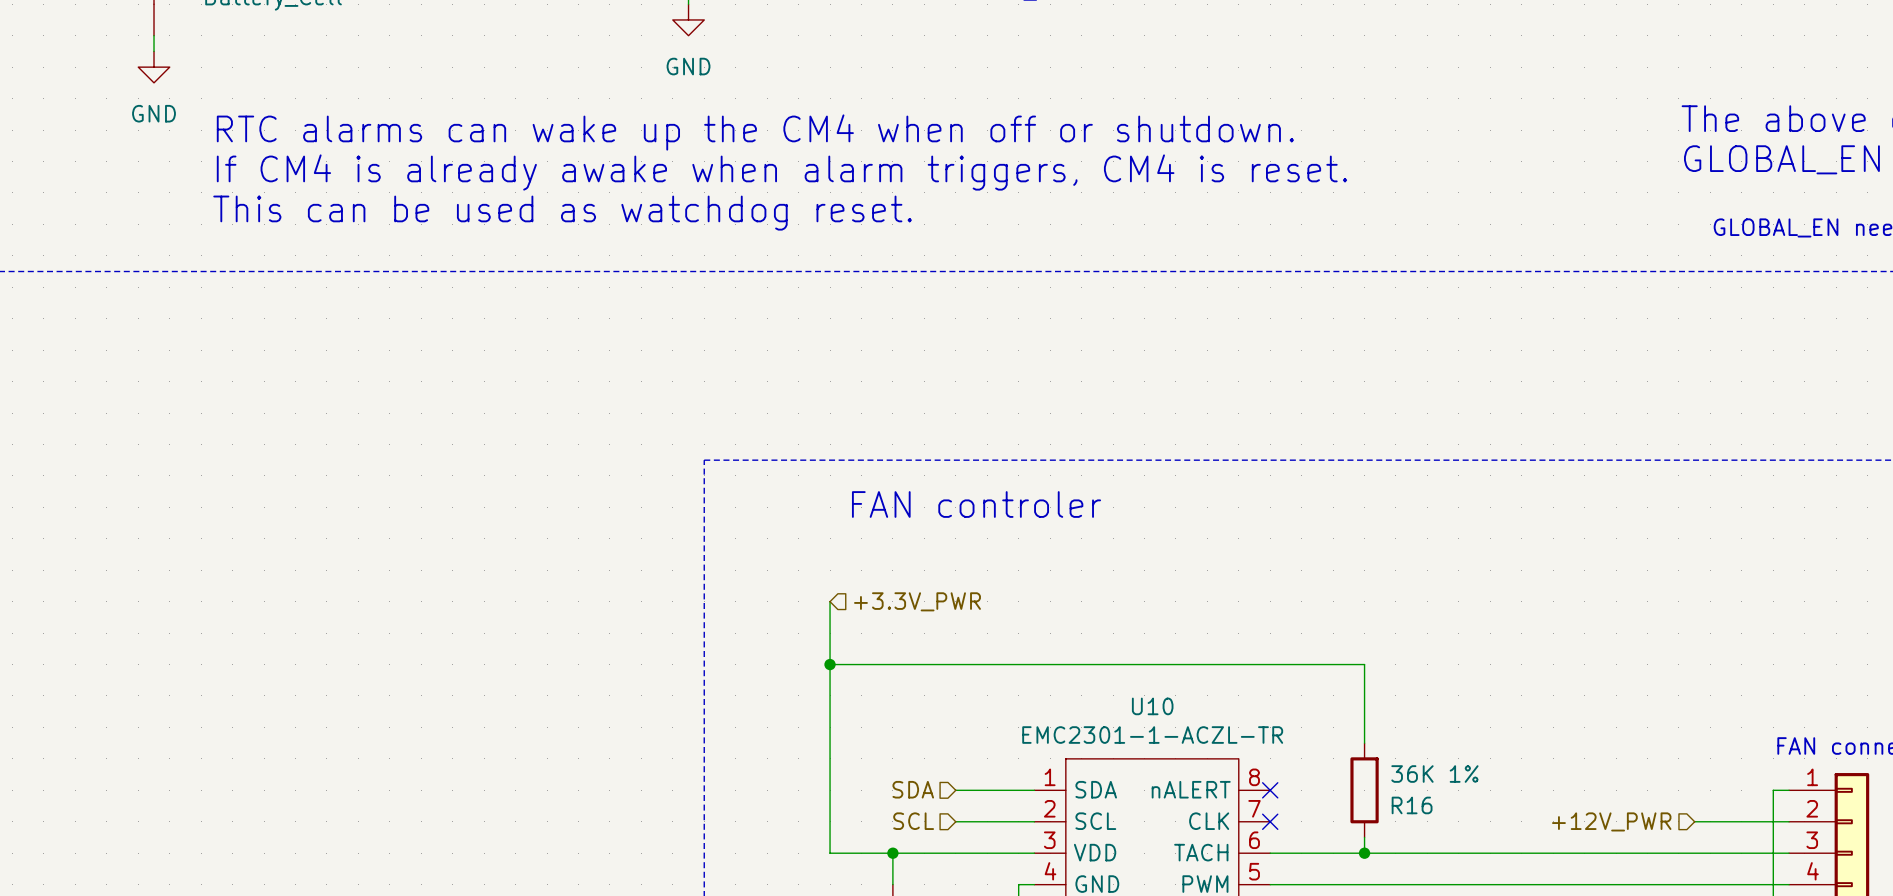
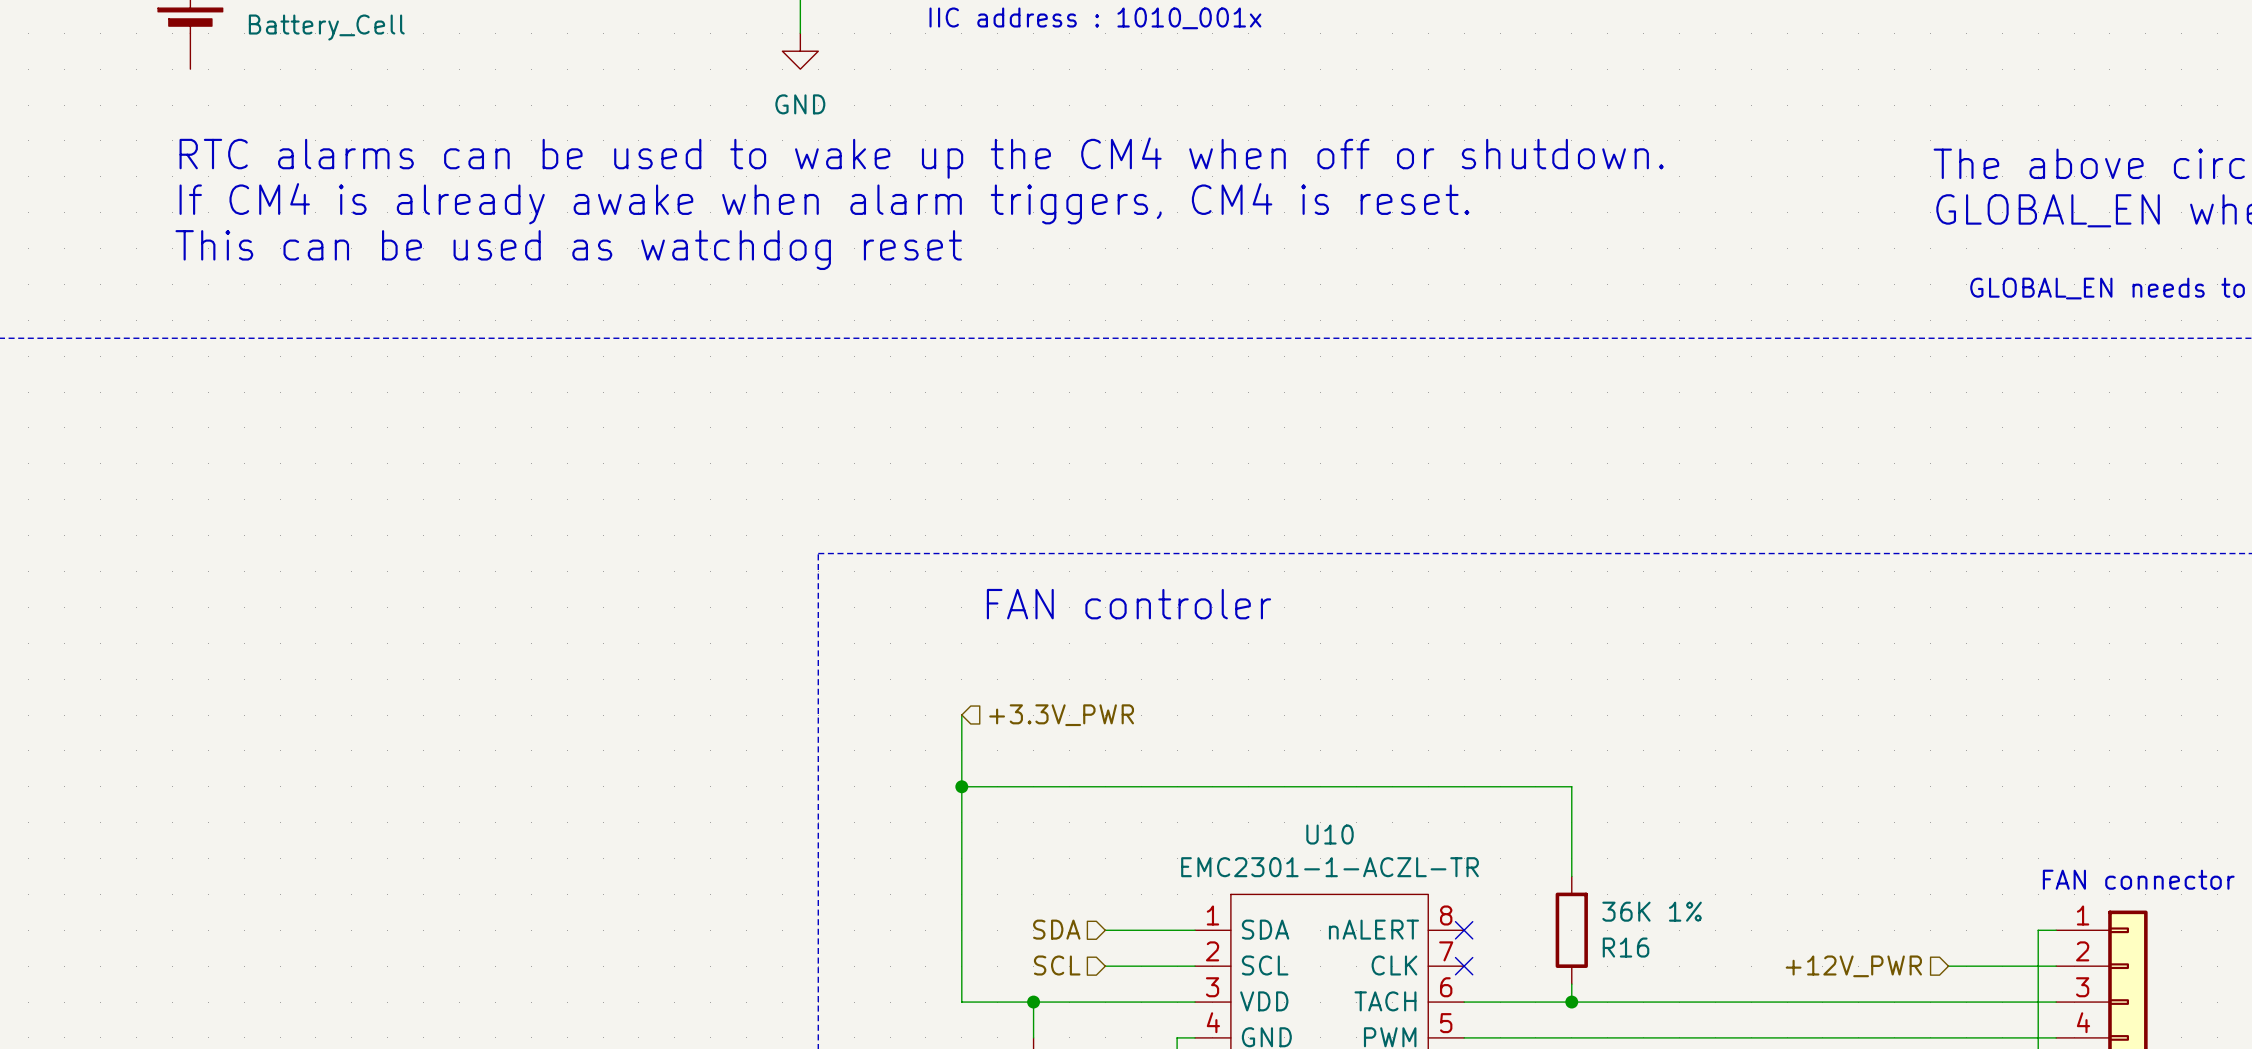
wire: (154, 35) (154, 51) -> none
power symbol: GND (154, 67) -> none
text: RTC alarms can wake up the CM4 when off or shutdown. (755, 132) -> RTC alarms can be used to wake up the CM4 when off or shutdown. (921, 158)
text position: If CM4 is already awake when alarm triggers, CM4 is reset. (781, 172) -> If CM4 is already awake when alarm triggers, CM4 is reset. (824, 203)
text: This can be used as watchdog reset. (562, 213) -> This can be used as watchdog reset (568, 250)

